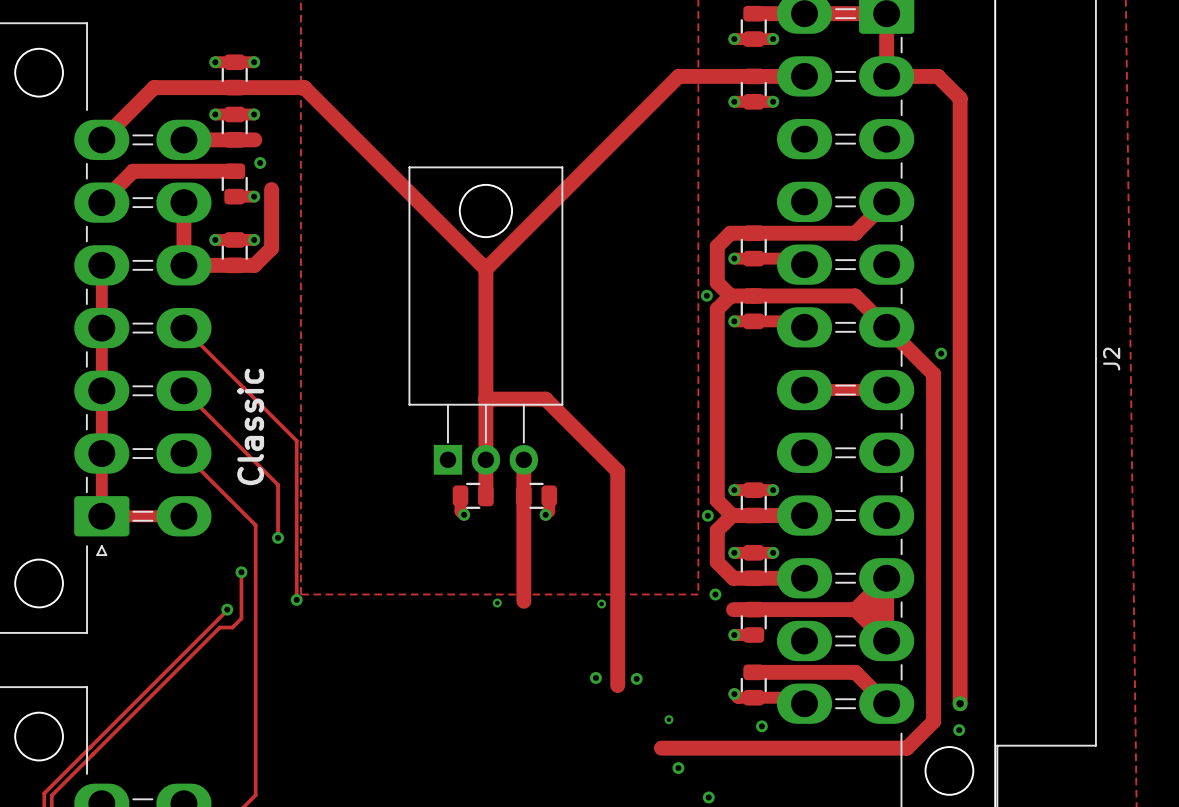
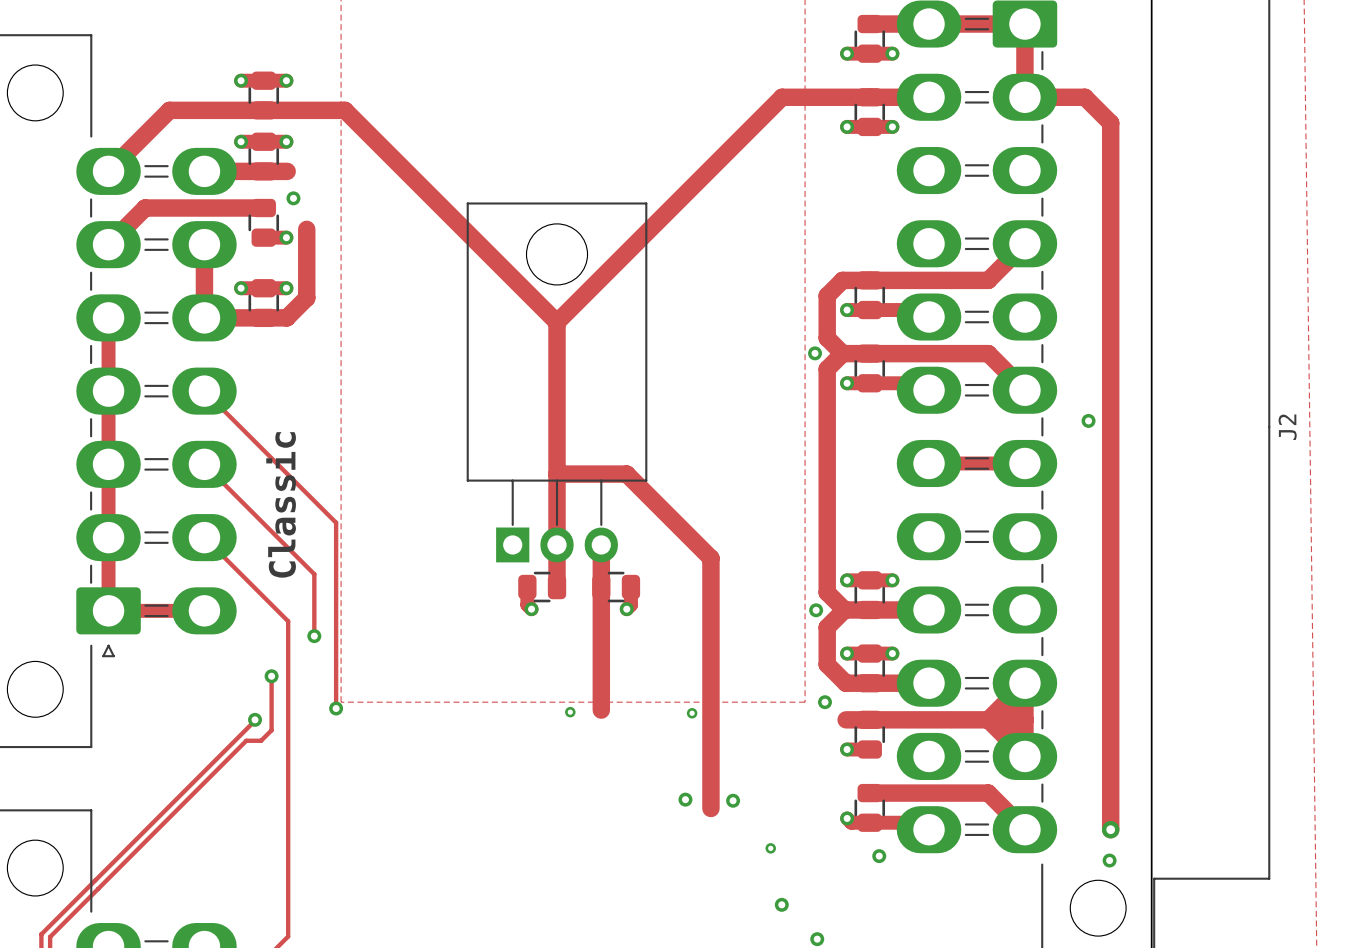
track: (886, 327) (933, 374) (933, 721) (907, 748) (661, 748) -> none

